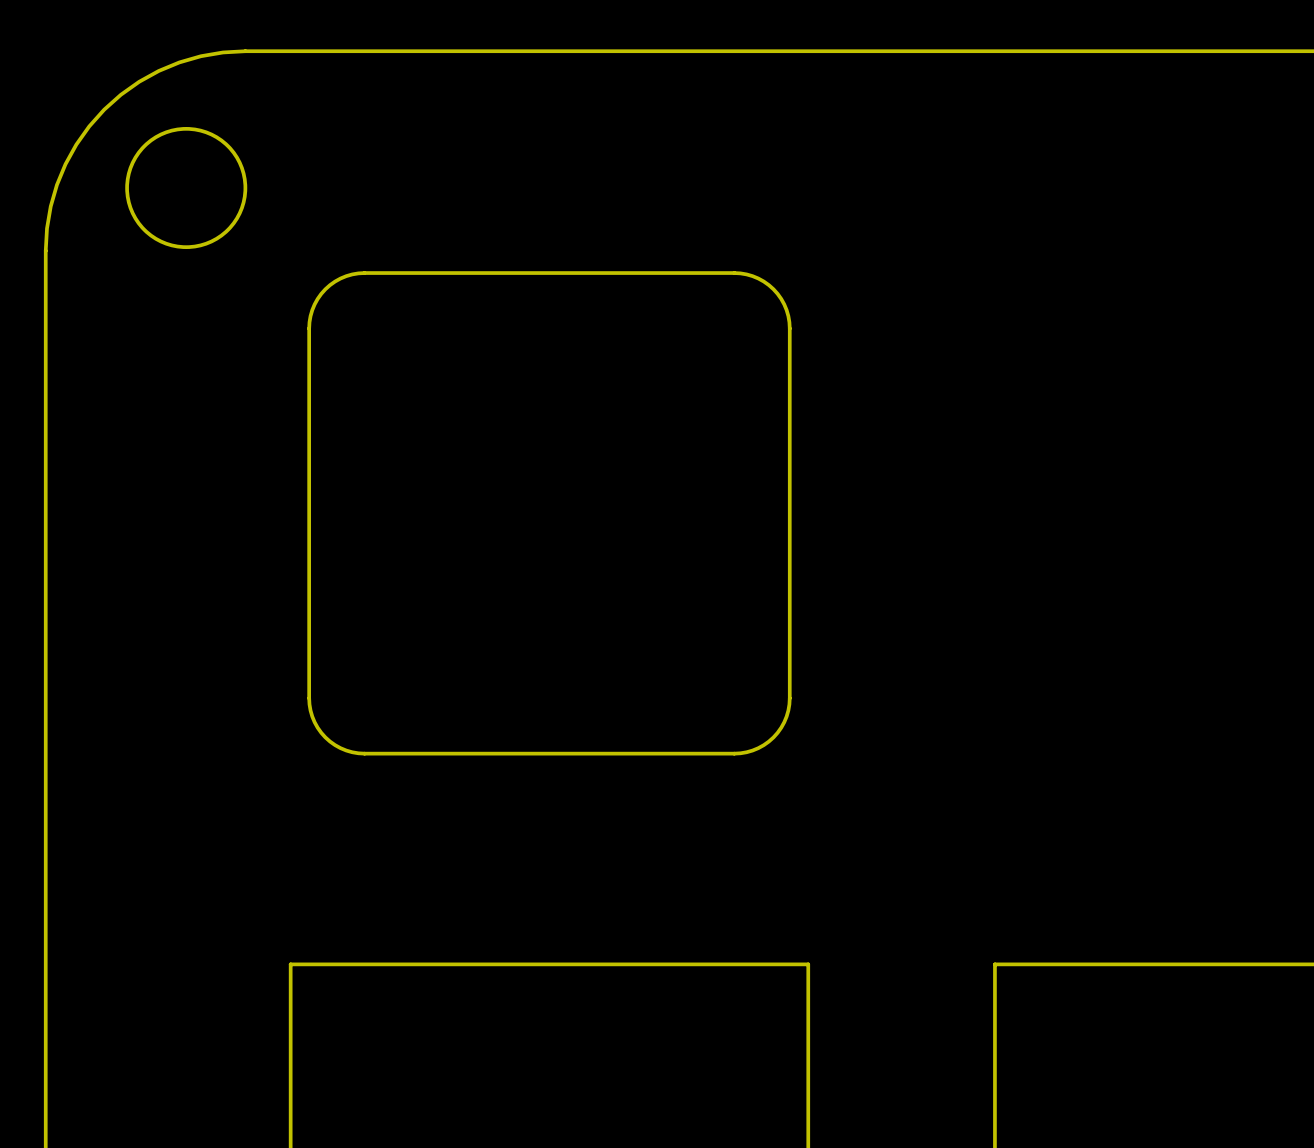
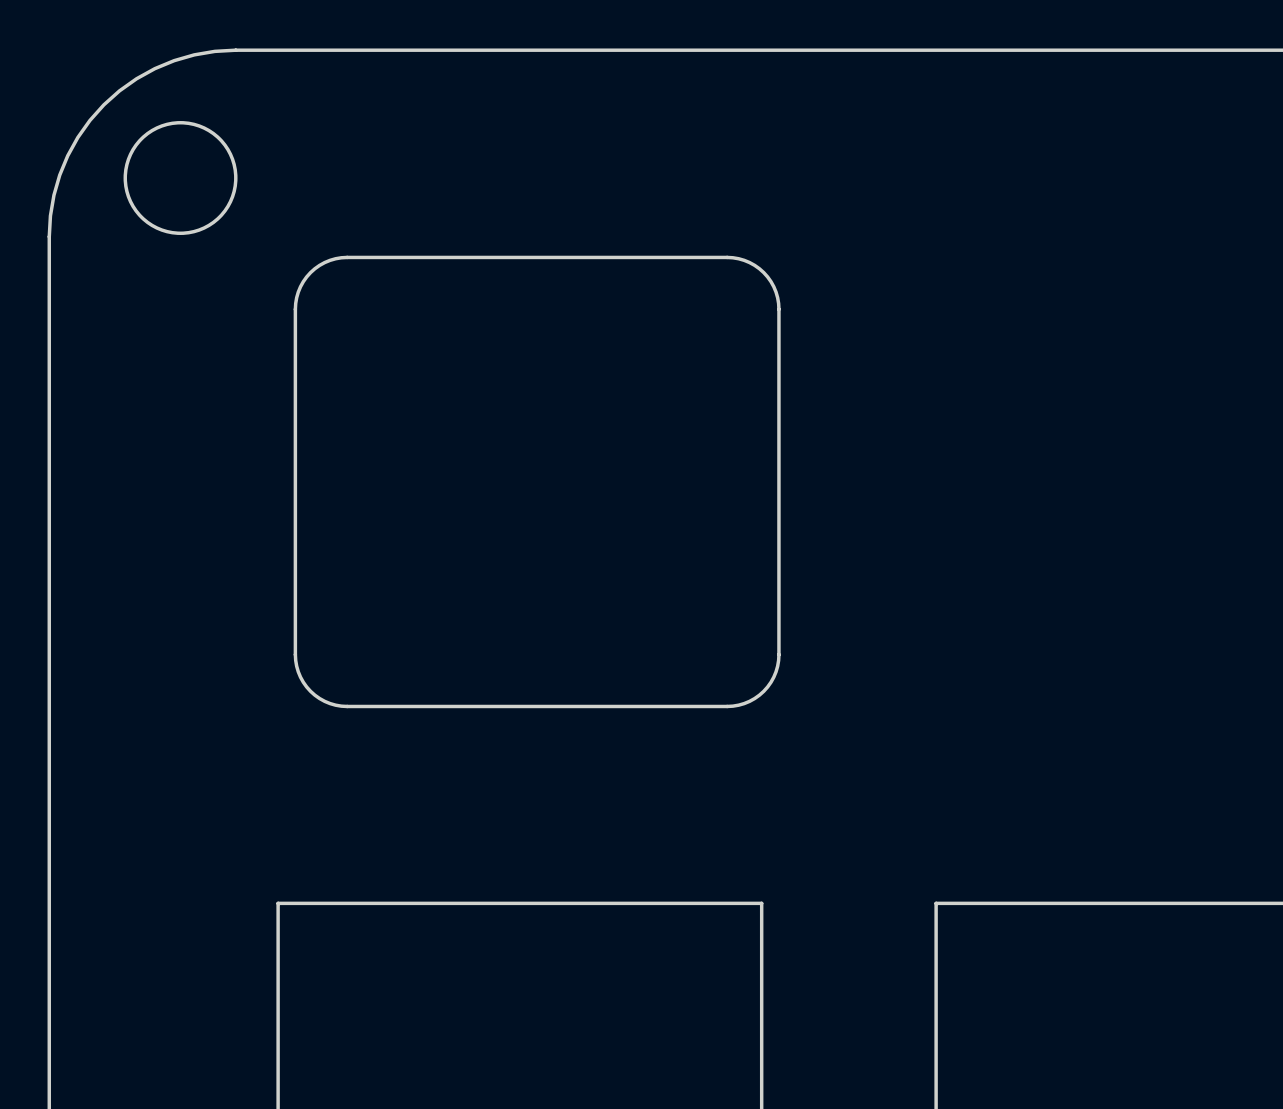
board edge: (734, 273) (758, 278) (773, 289) (786, 310) (789, 328) (789, 704) (784, 722) (773, 737) (758, 748) (734, 753) -> (692, 257) (732, 257) (754, 265) (767, 276) (773, 286) (778, 309) (777, 666) (767, 686) (749, 701) (732, 706) (692, 706)

